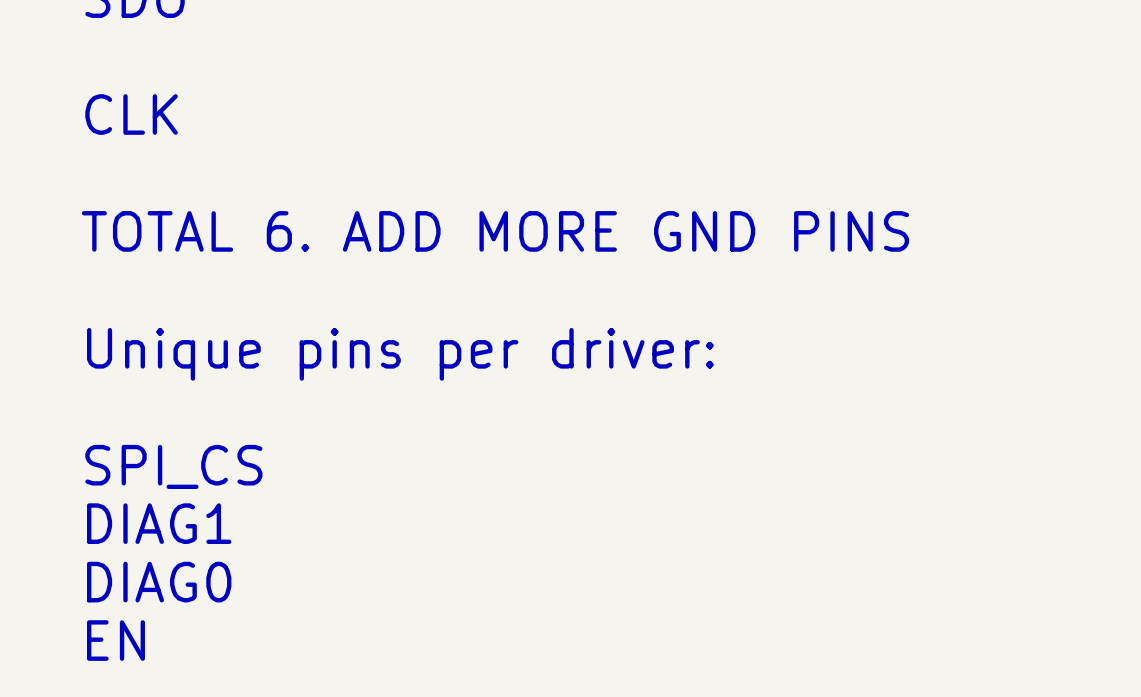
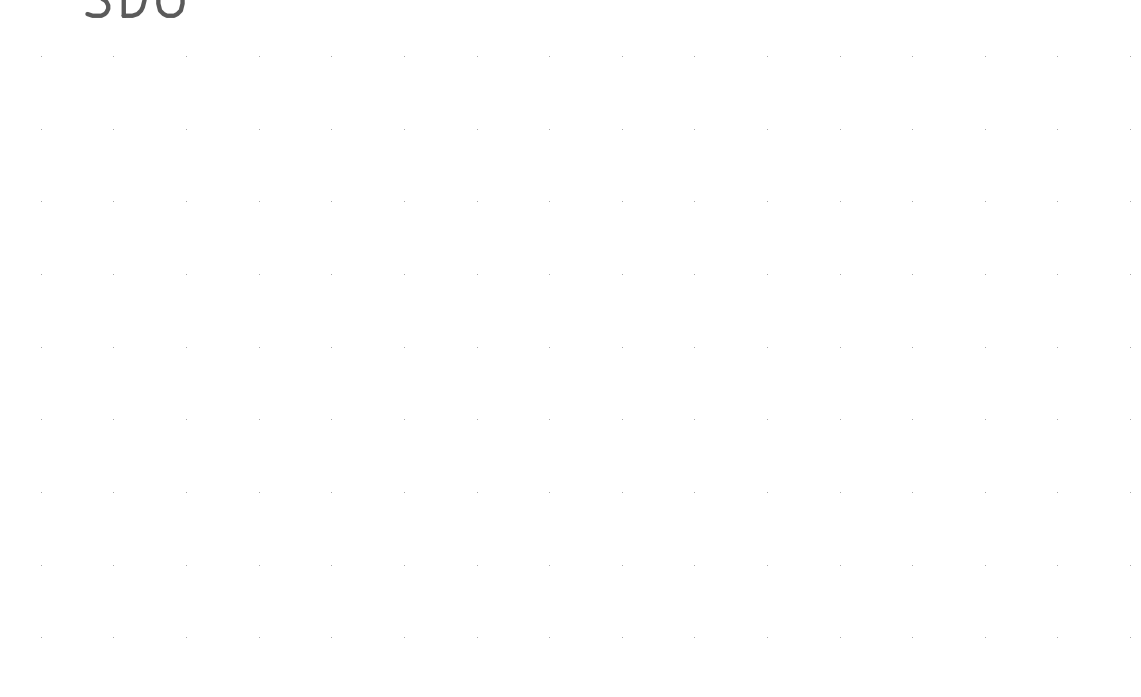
text: CLK (131, 114) -> none
text: TOTAL 6. ADD MORE GND PINS (495, 231) -> none
text: Unique pins per driver: (400, 354) -> none
text: SPI_CS (173, 466) -> none
text: DIAG1 (159, 523) -> none
text: DIAG0 (159, 582) -> none
text: EN (115, 640) -> none

